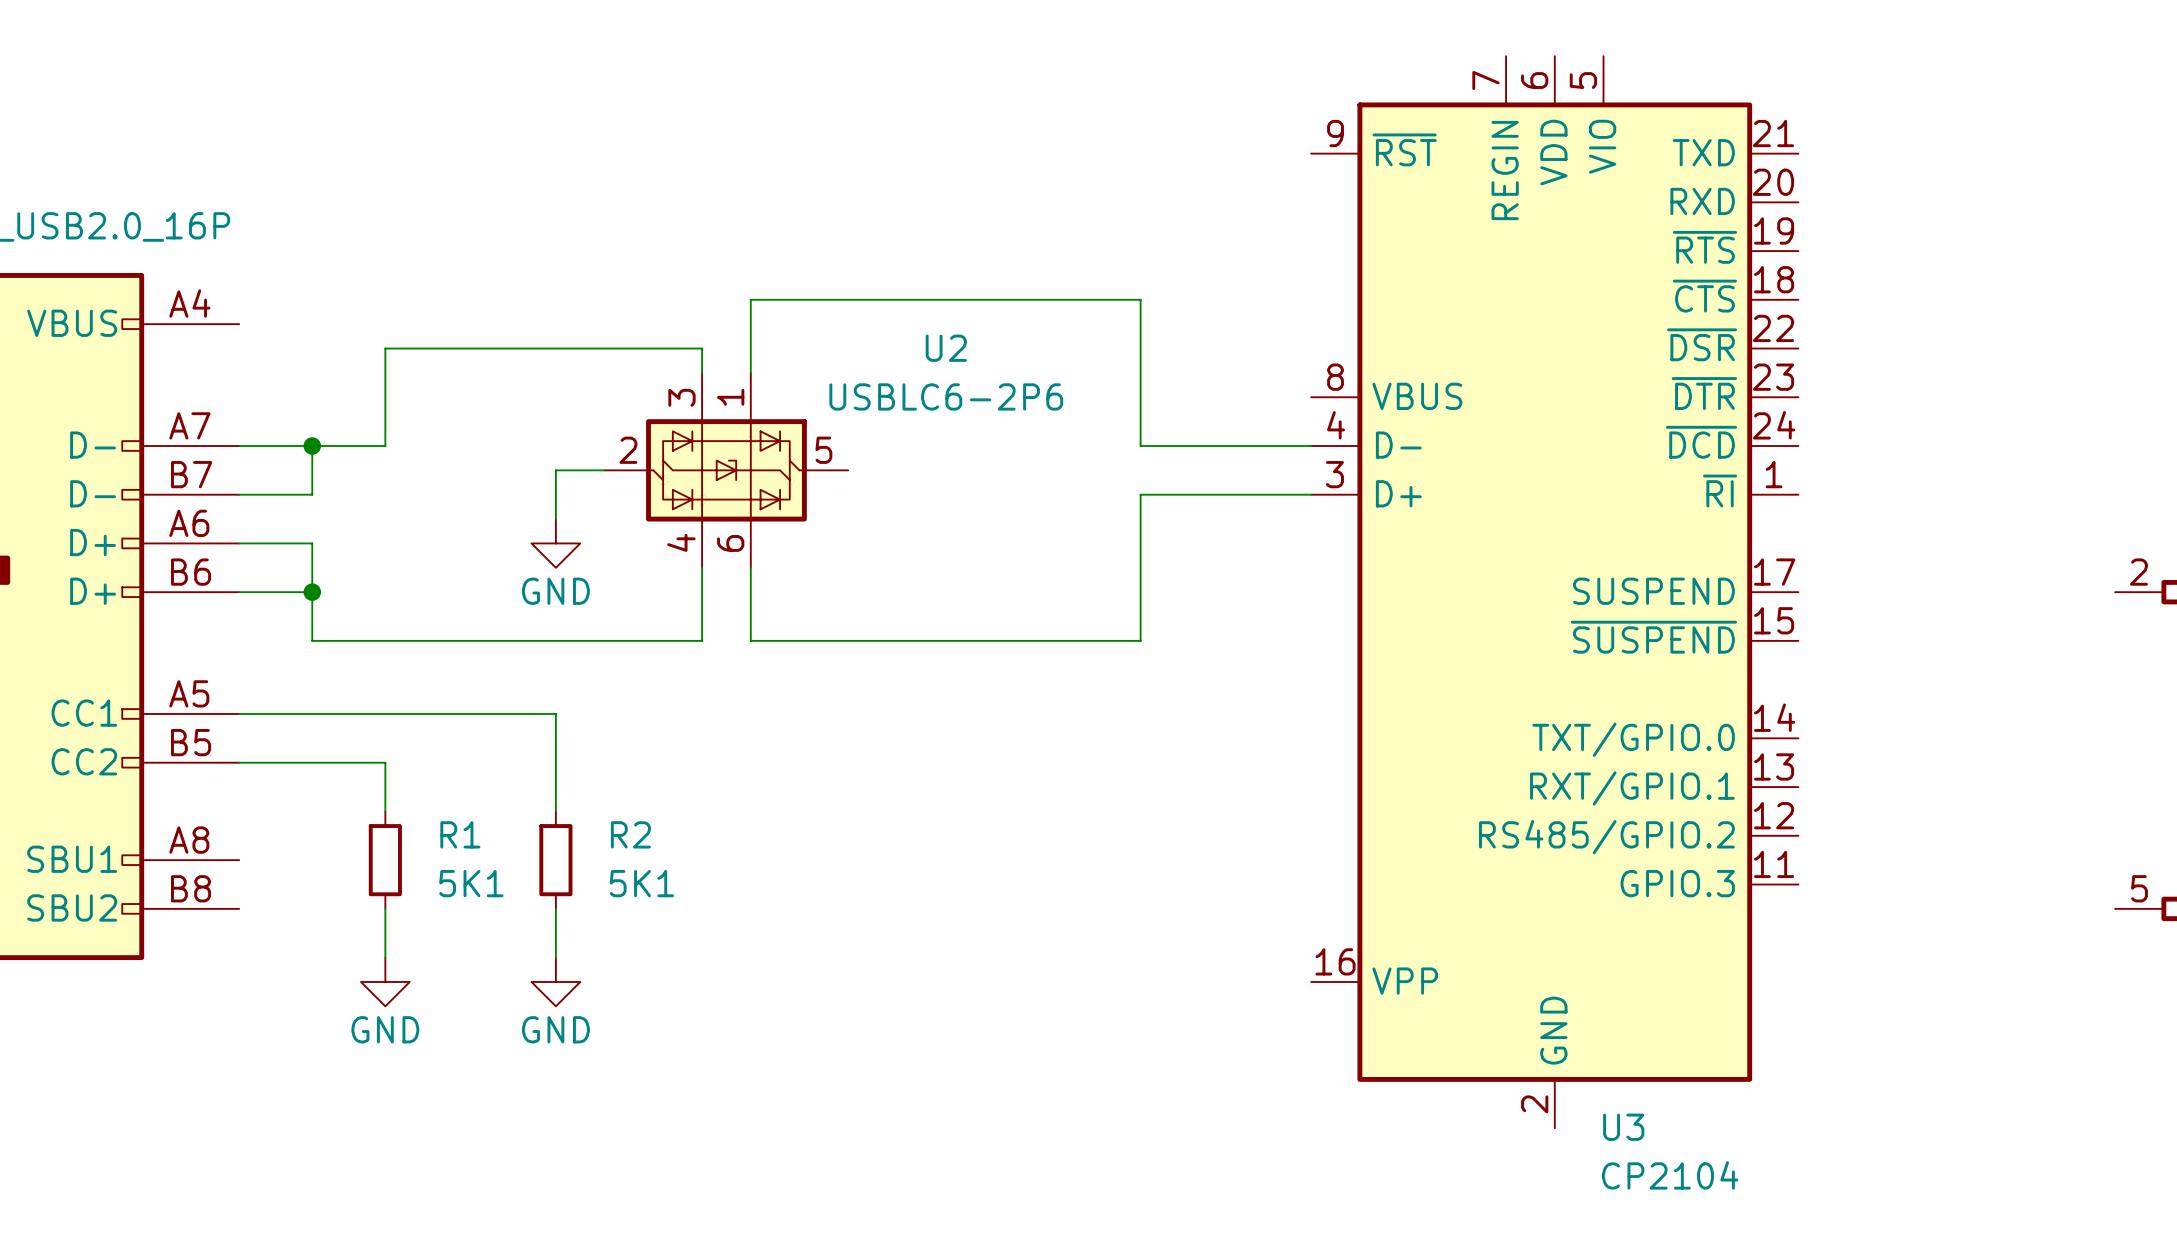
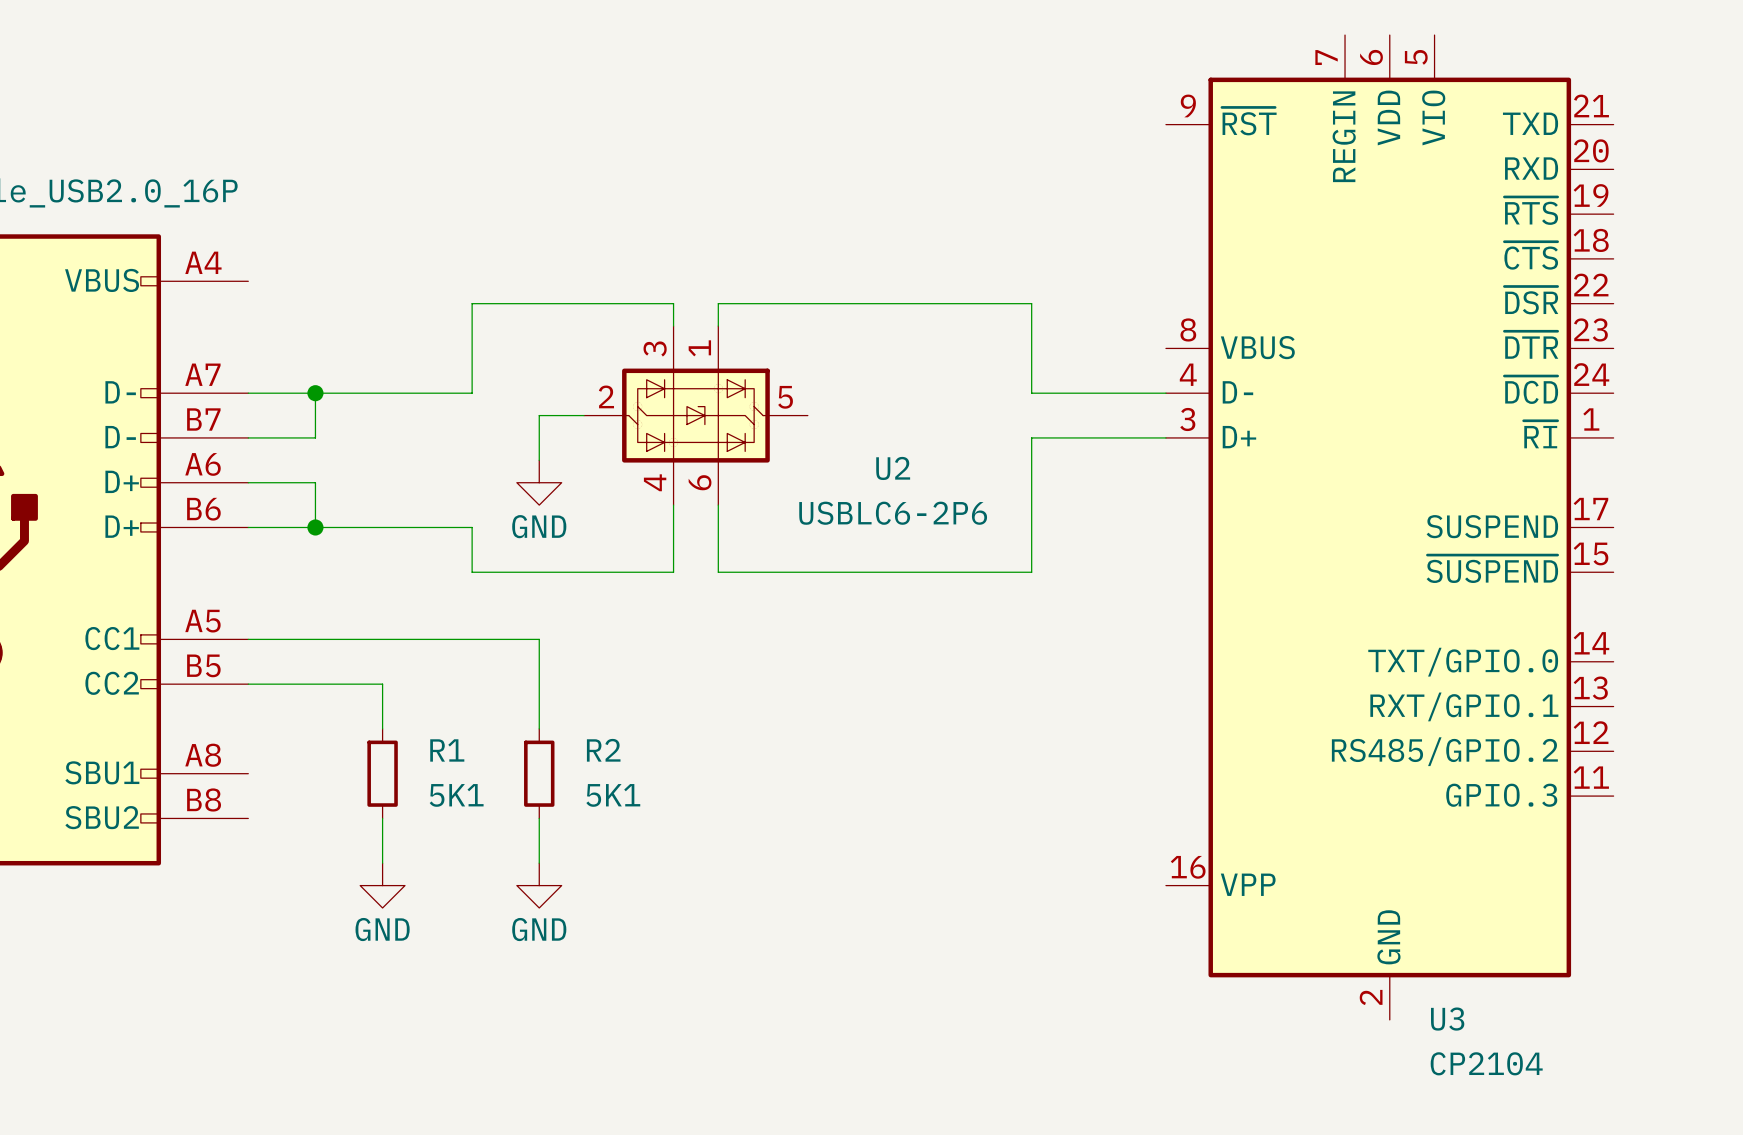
wire: (482, 348) (385, 348) (385, 445) -> (472, 303) (472, 393) (382, 393)
wire: (750, 348) (750, 299) (1140, 299) (1140, 445) -> (718, 303) (1031, 303) (1031, 393) (1076, 393)
U2 name position: U2 (946, 348) -> U2 (893, 468)
U2 value position: USBLC6-2P6 (946, 396) -> USBLC6-2P6 (893, 513)
wire: (1140, 494) (1140, 640) (1091, 640) -> (1076, 437) (1031, 437) (1031, 572)
wire: (312, 592) (312, 640) (482, 640) -> (315, 527) (472, 527) (472, 572)
U3 position: (1554, 592) -> (1389, 527)

